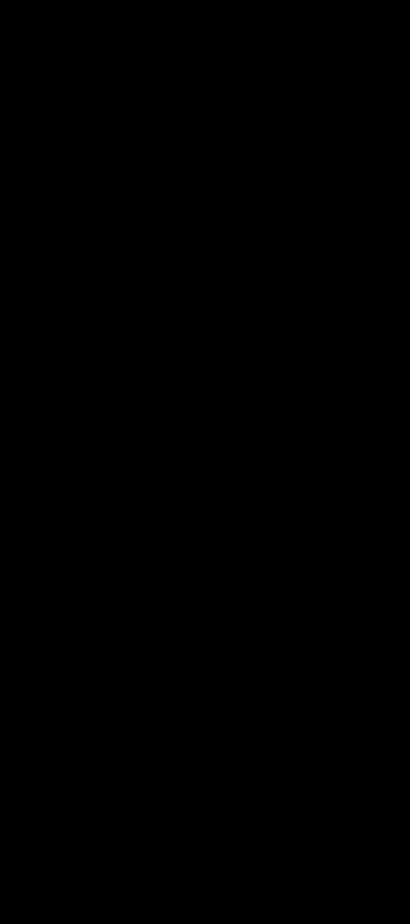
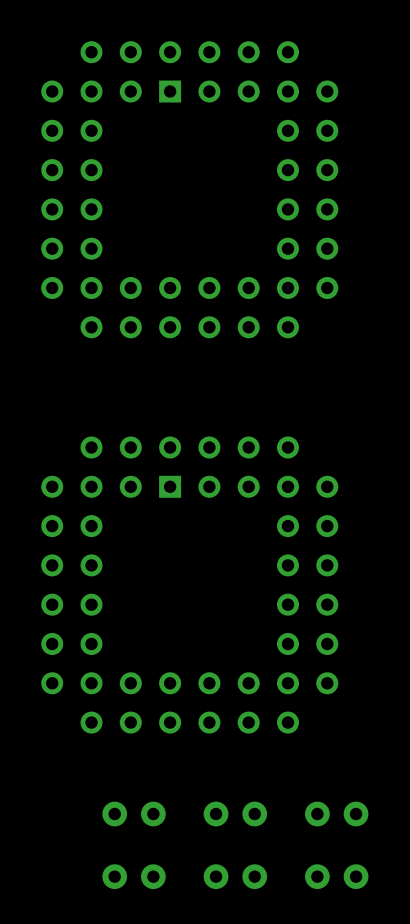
part: none -> (189, 189)
part: none -> (189, 585)
part: none -> (134, 814)
part: none -> (235, 814)
part: none -> (336, 814)
part: none -> (134, 876)
part: none -> (235, 876)
part: none -> (336, 876)

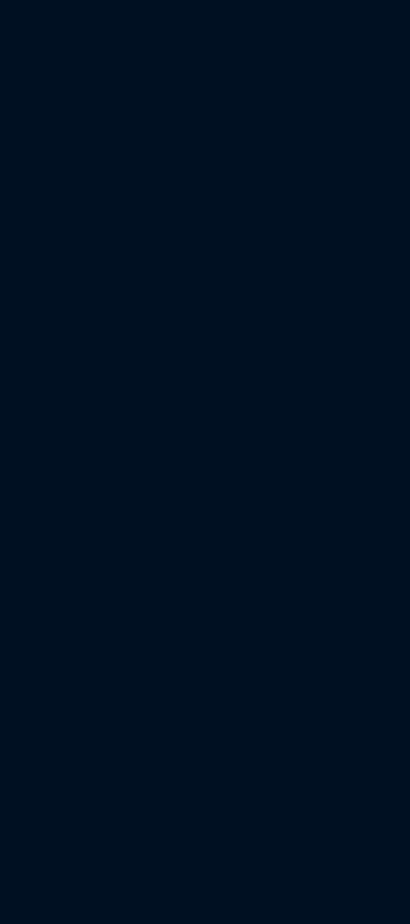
part: (189, 189) -> none
part: (189, 585) -> none
part: (134, 814) -> none
part: (235, 814) -> none
part: (336, 814) -> none
part: (134, 876) -> none
part: (235, 876) -> none
part: (336, 876) -> none

